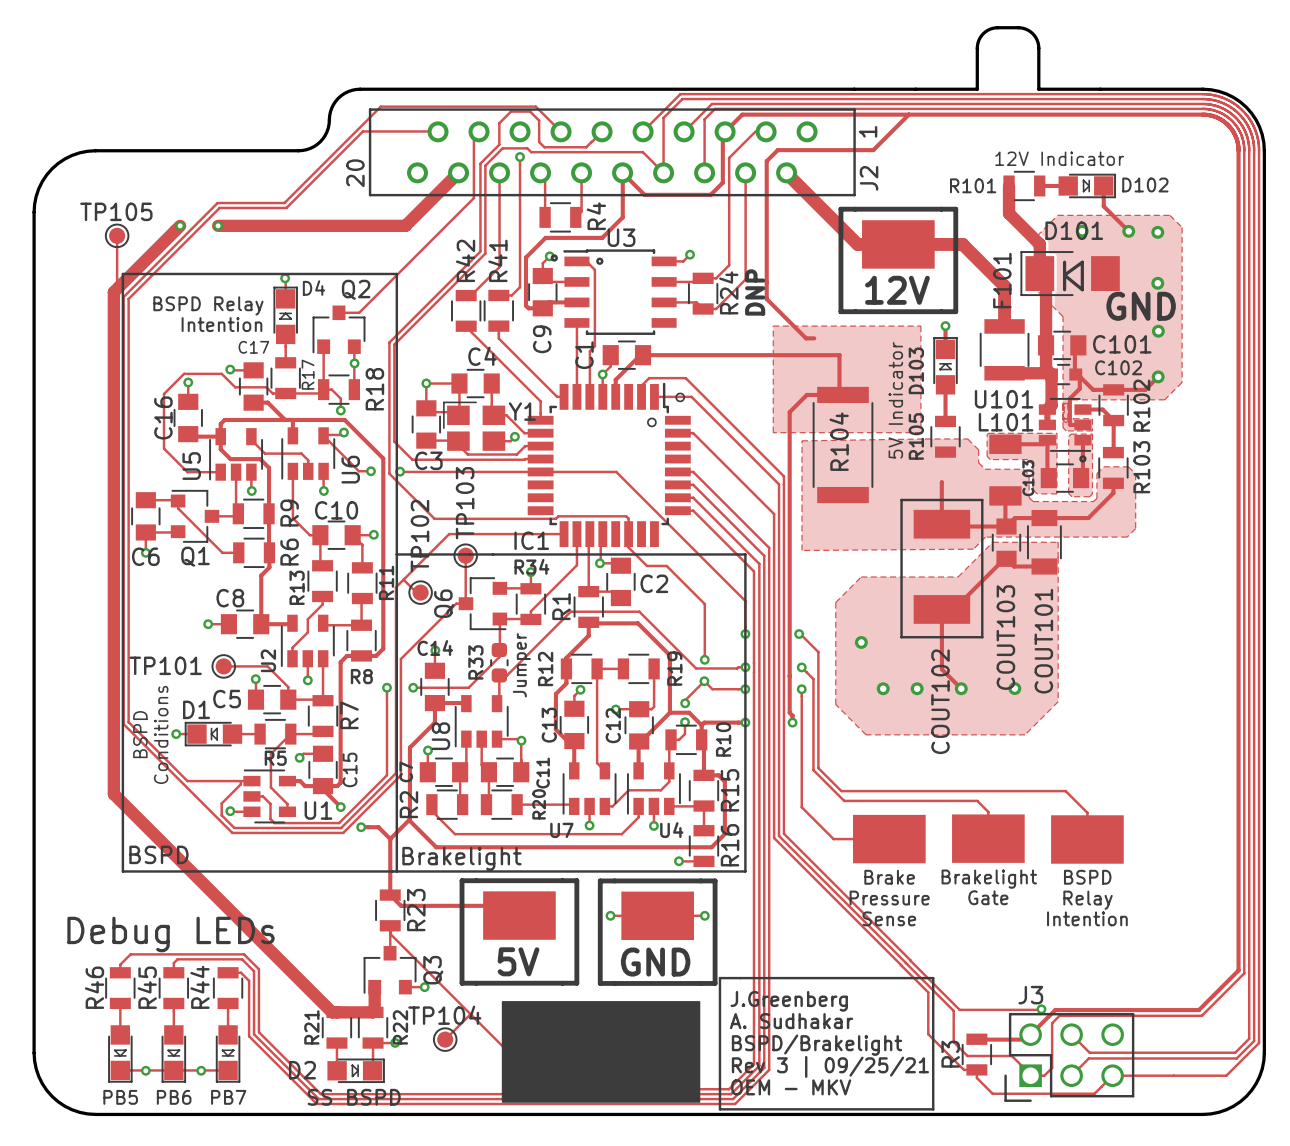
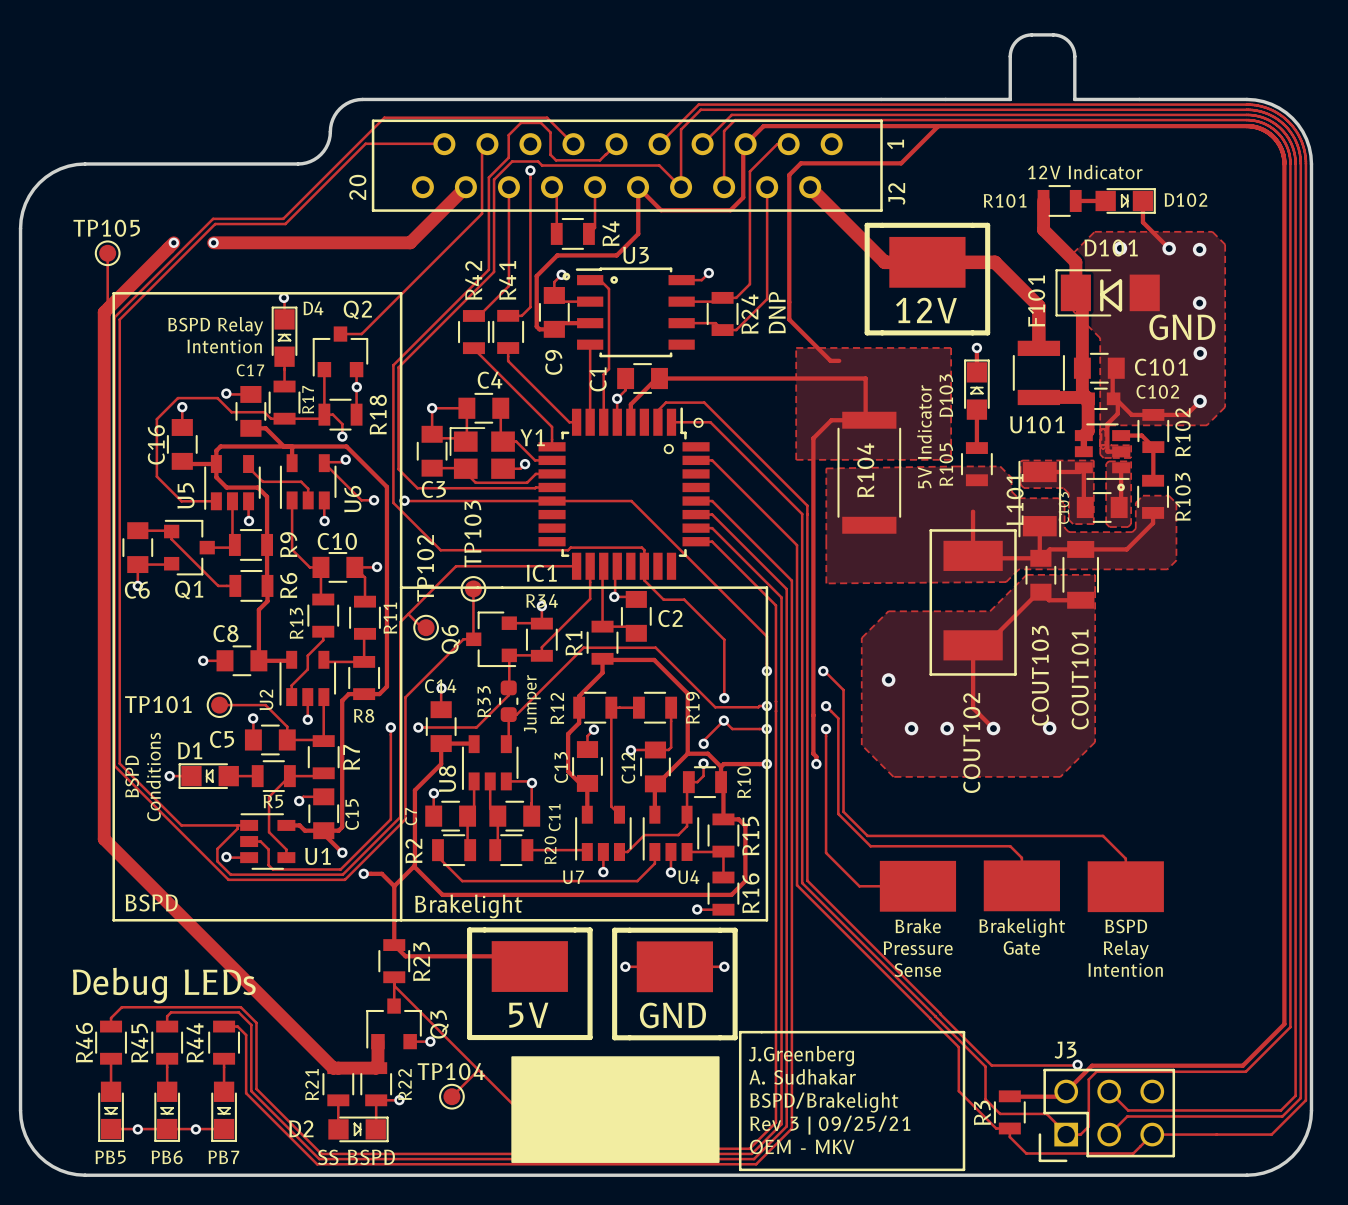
L101 name position: L101 (1006, 422) -> L101 (1015, 499)
L101 footprint: [989, 434, 1022, 506] -> [1018, 460, 1062, 538]

